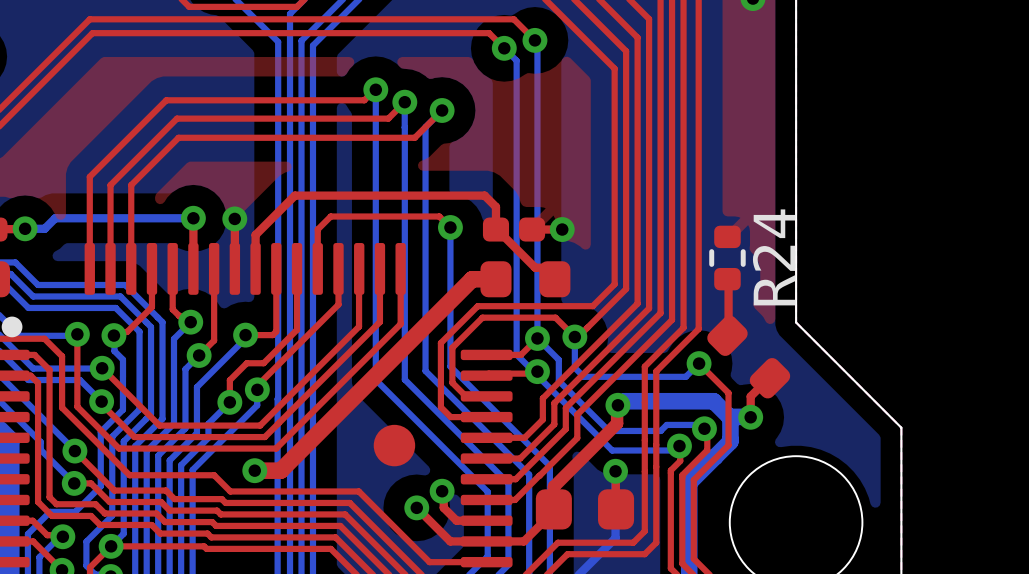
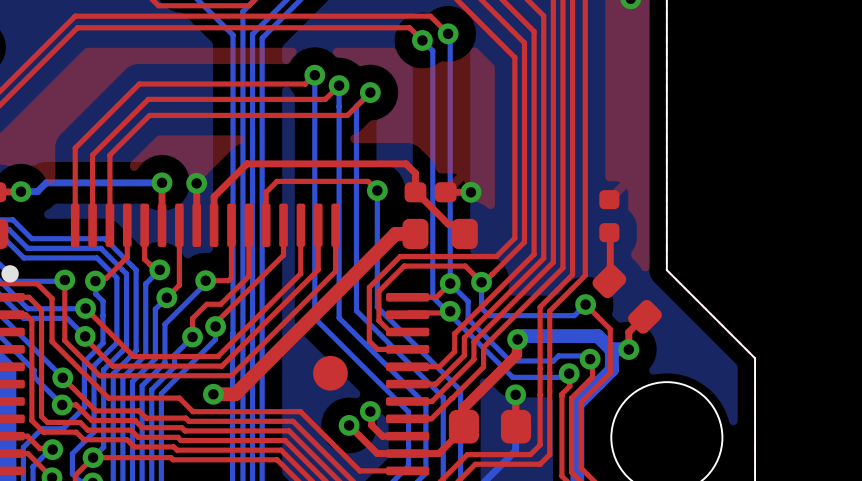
R24: (727, 258) -> none
part: none -> (609, 216)

